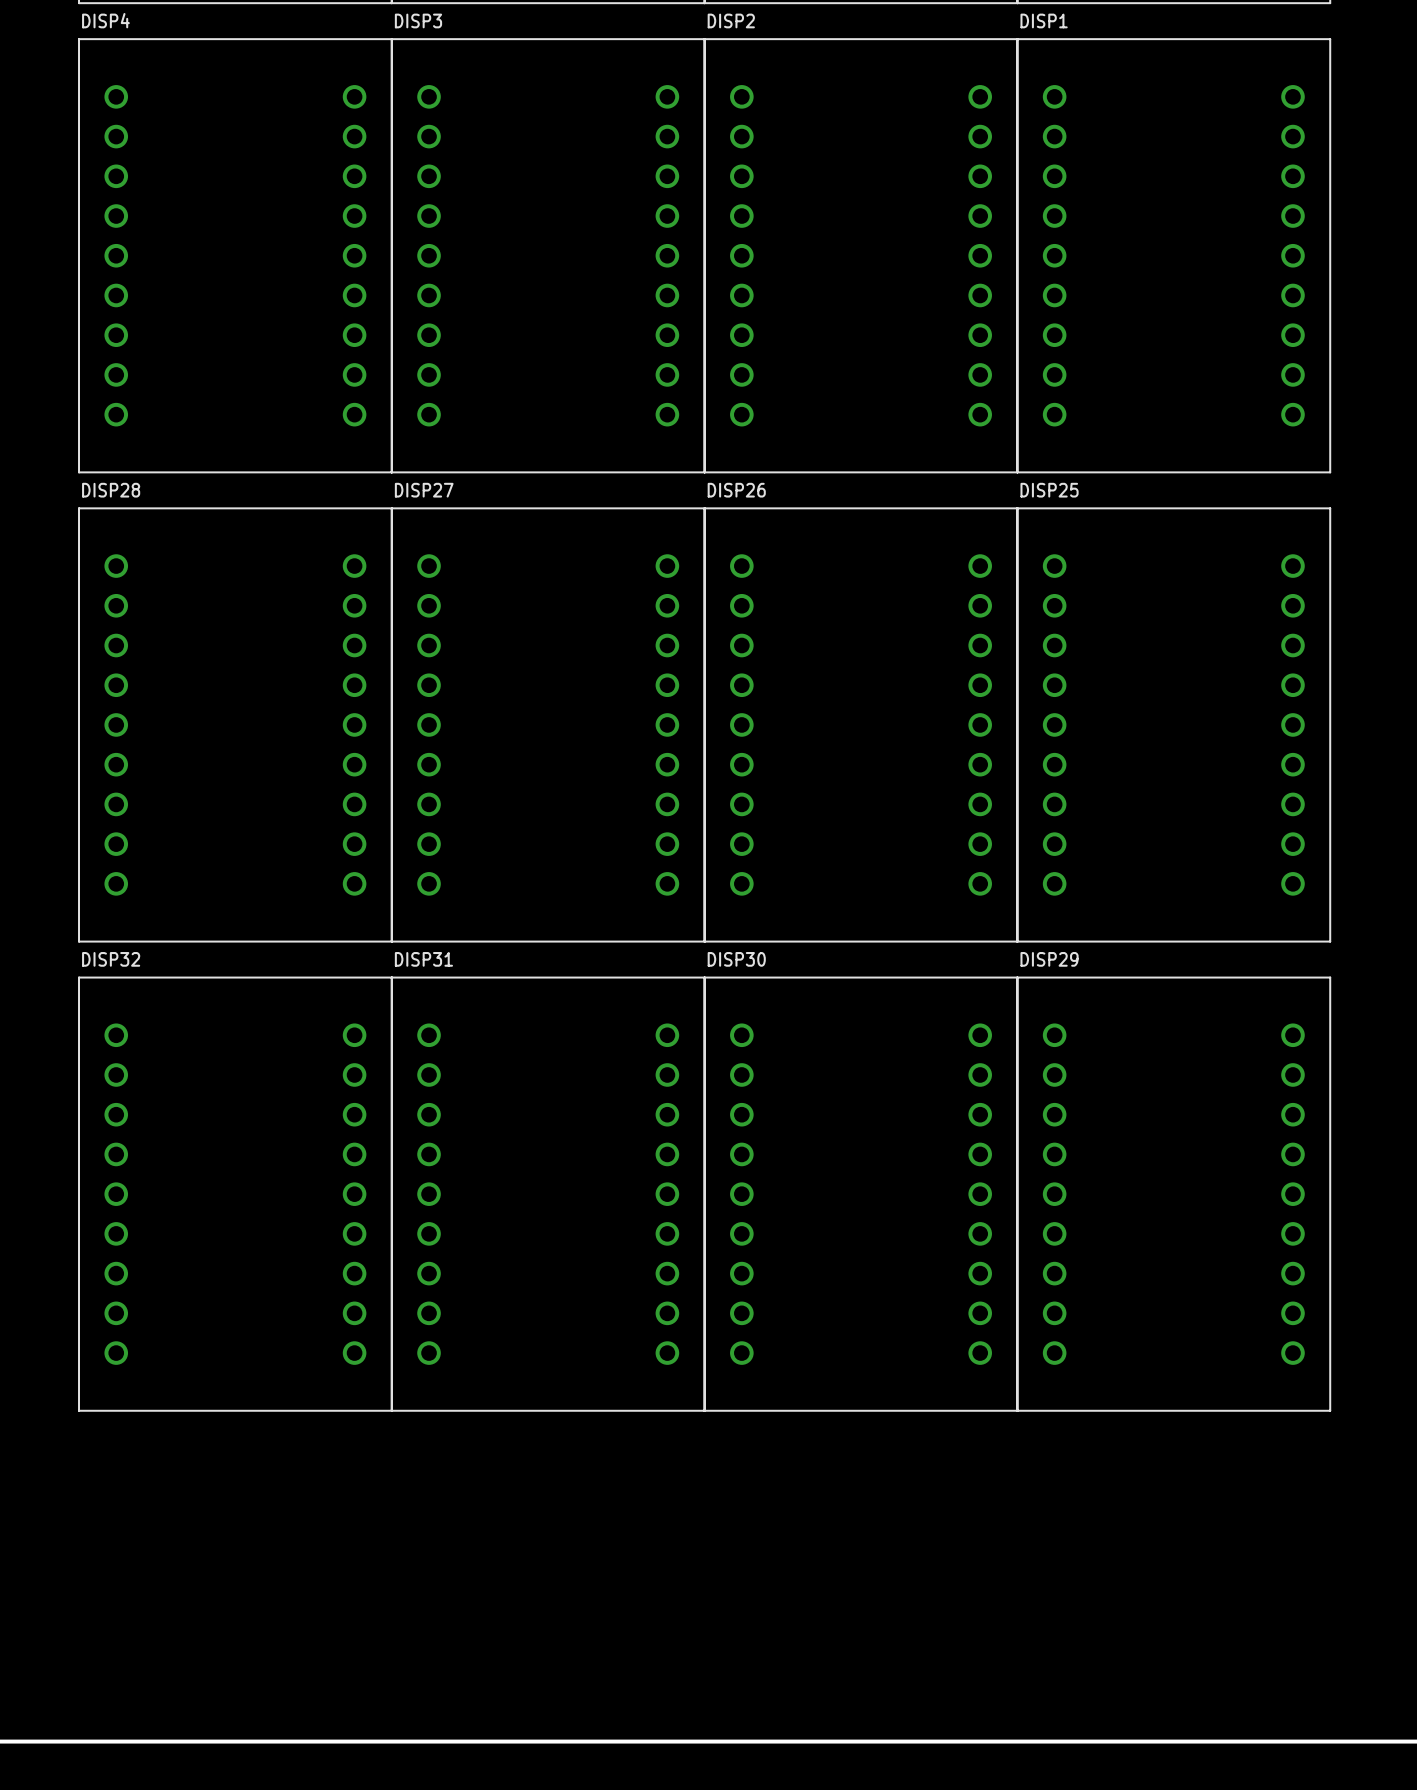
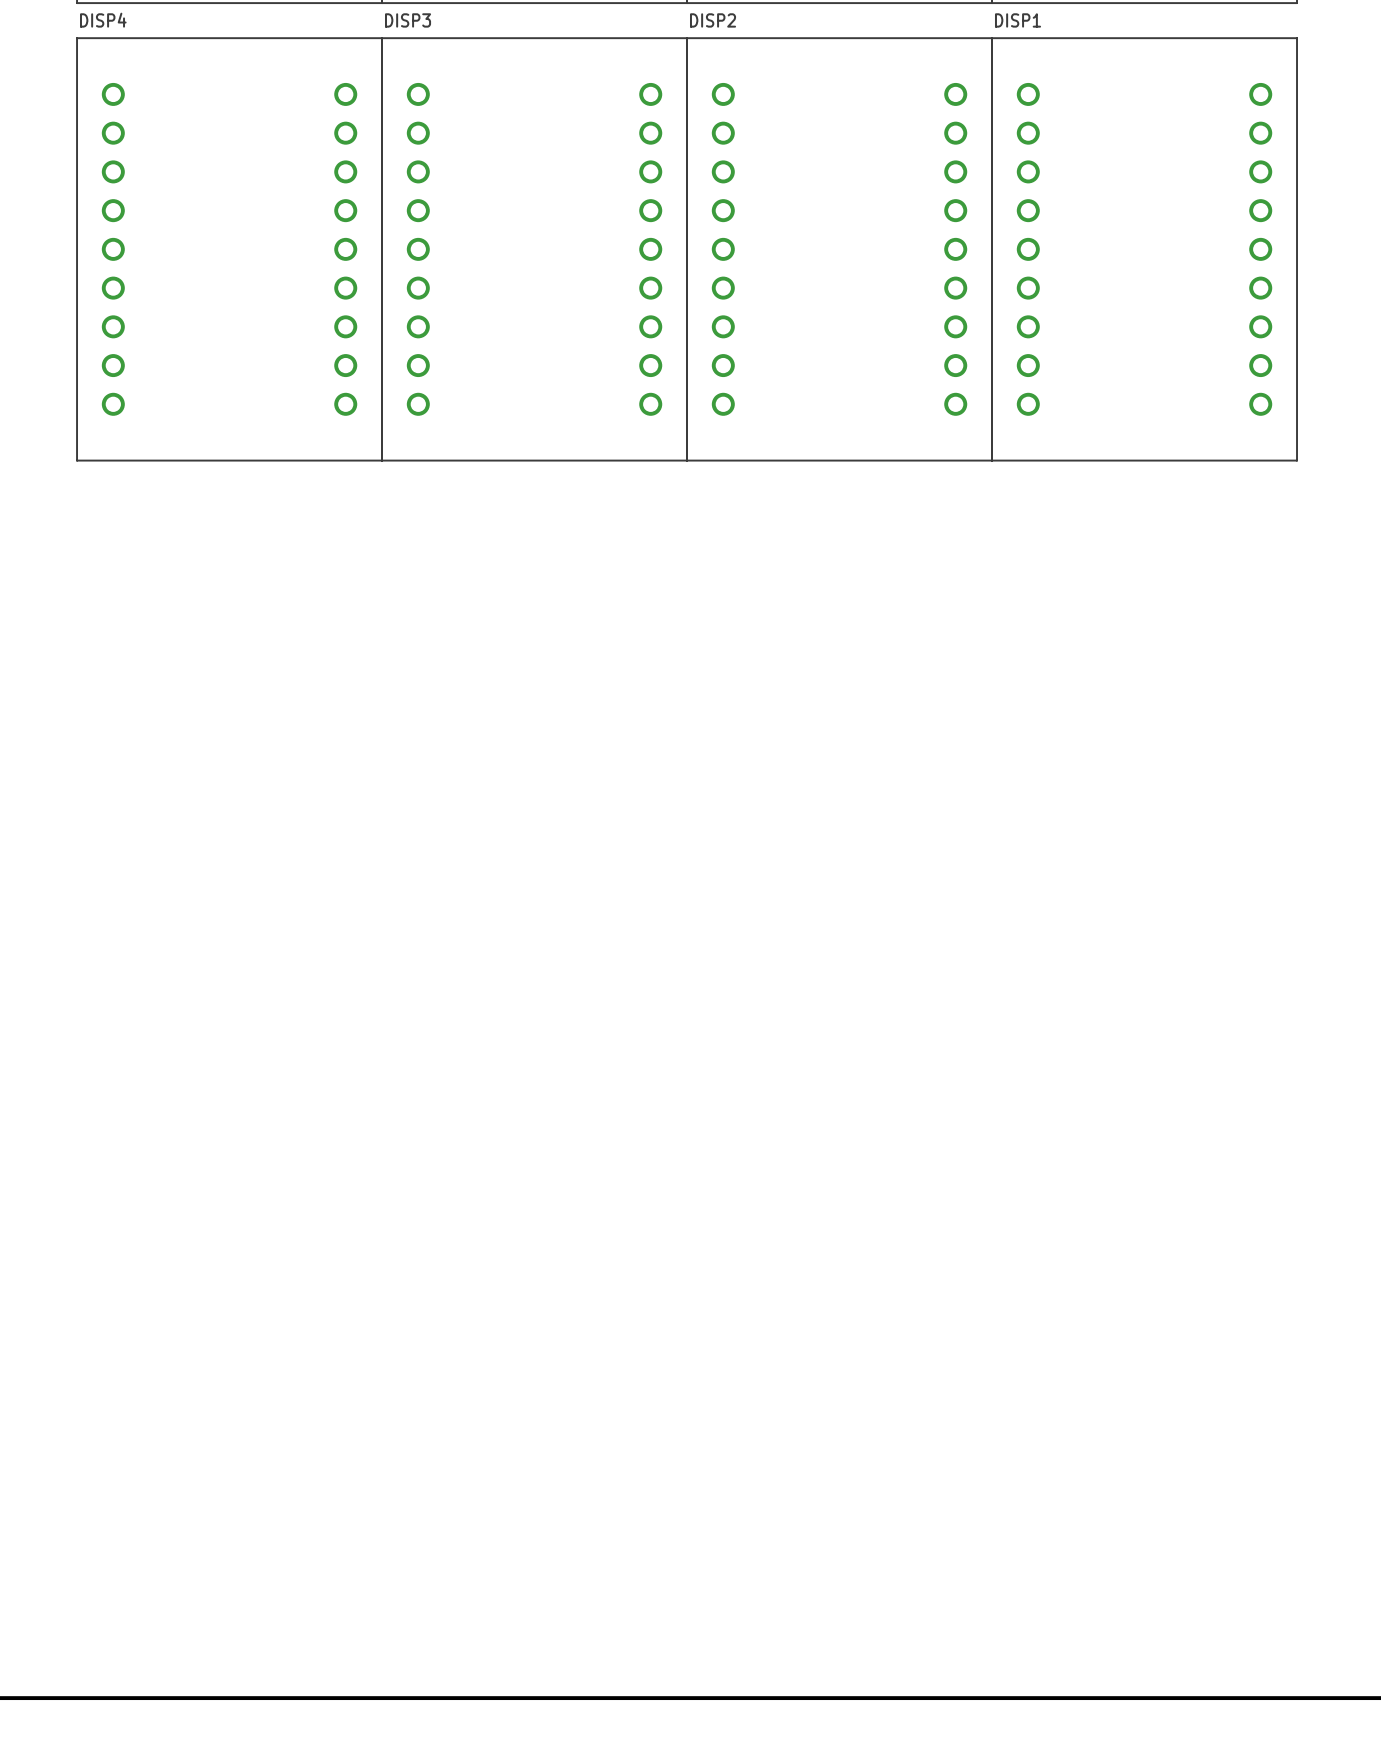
DISP28: (235, 724) -> none
DISP27: (548, 724) -> none
DISP26: (861, 724) -> none
DISP25: (1173, 724) -> none
DISP32: (235, 1194) -> none
DISP31: (548, 1194) -> none
DISP30: (861, 1194) -> none
DISP29: (1173, 1194) -> none

